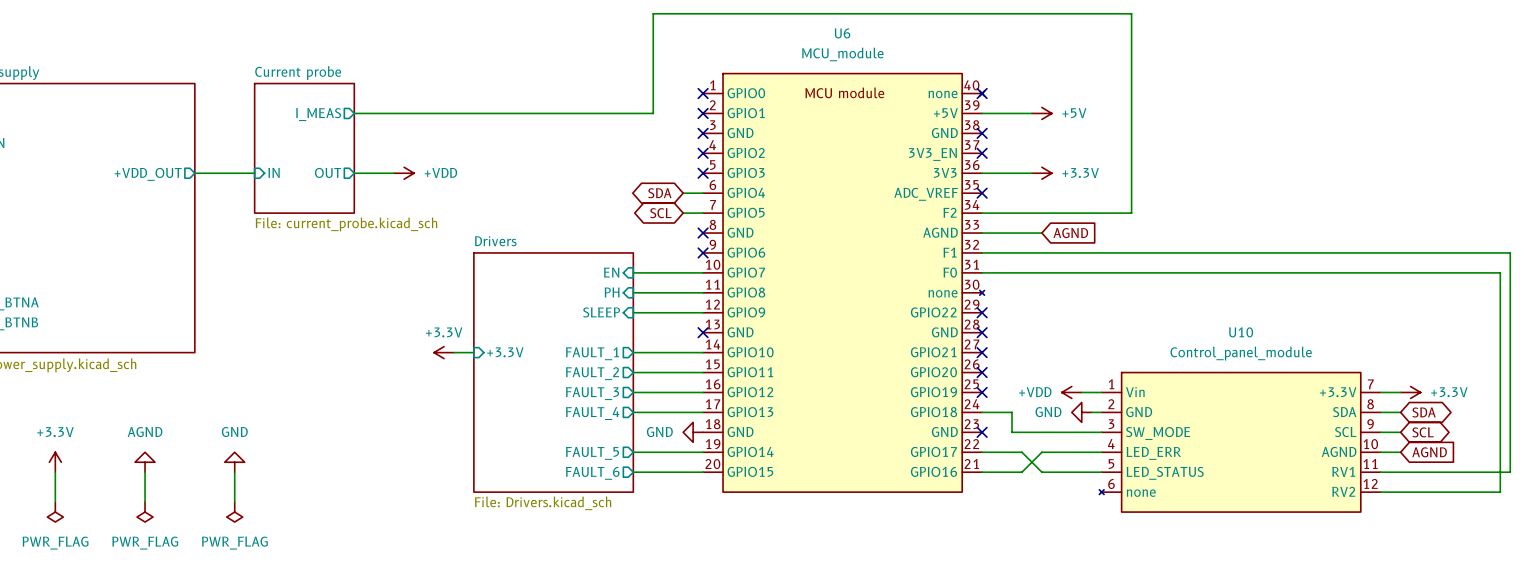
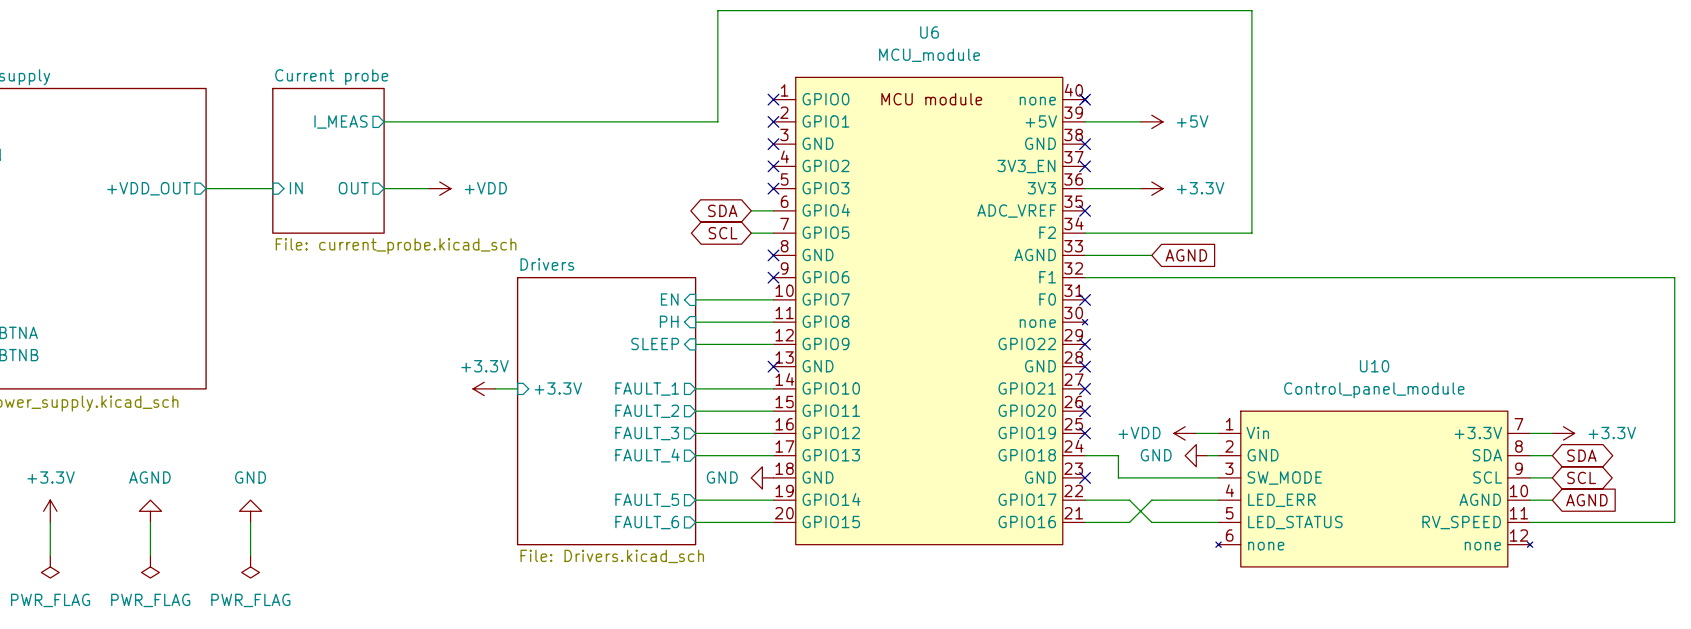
wire: (982, 272) (1500, 272) (1500, 492) (1380, 492) -> none
no-connect mark: none -> (1085, 299)
U10 symbol: [1099, 372, 1381, 513] -> [1215, 411, 1533, 567]

